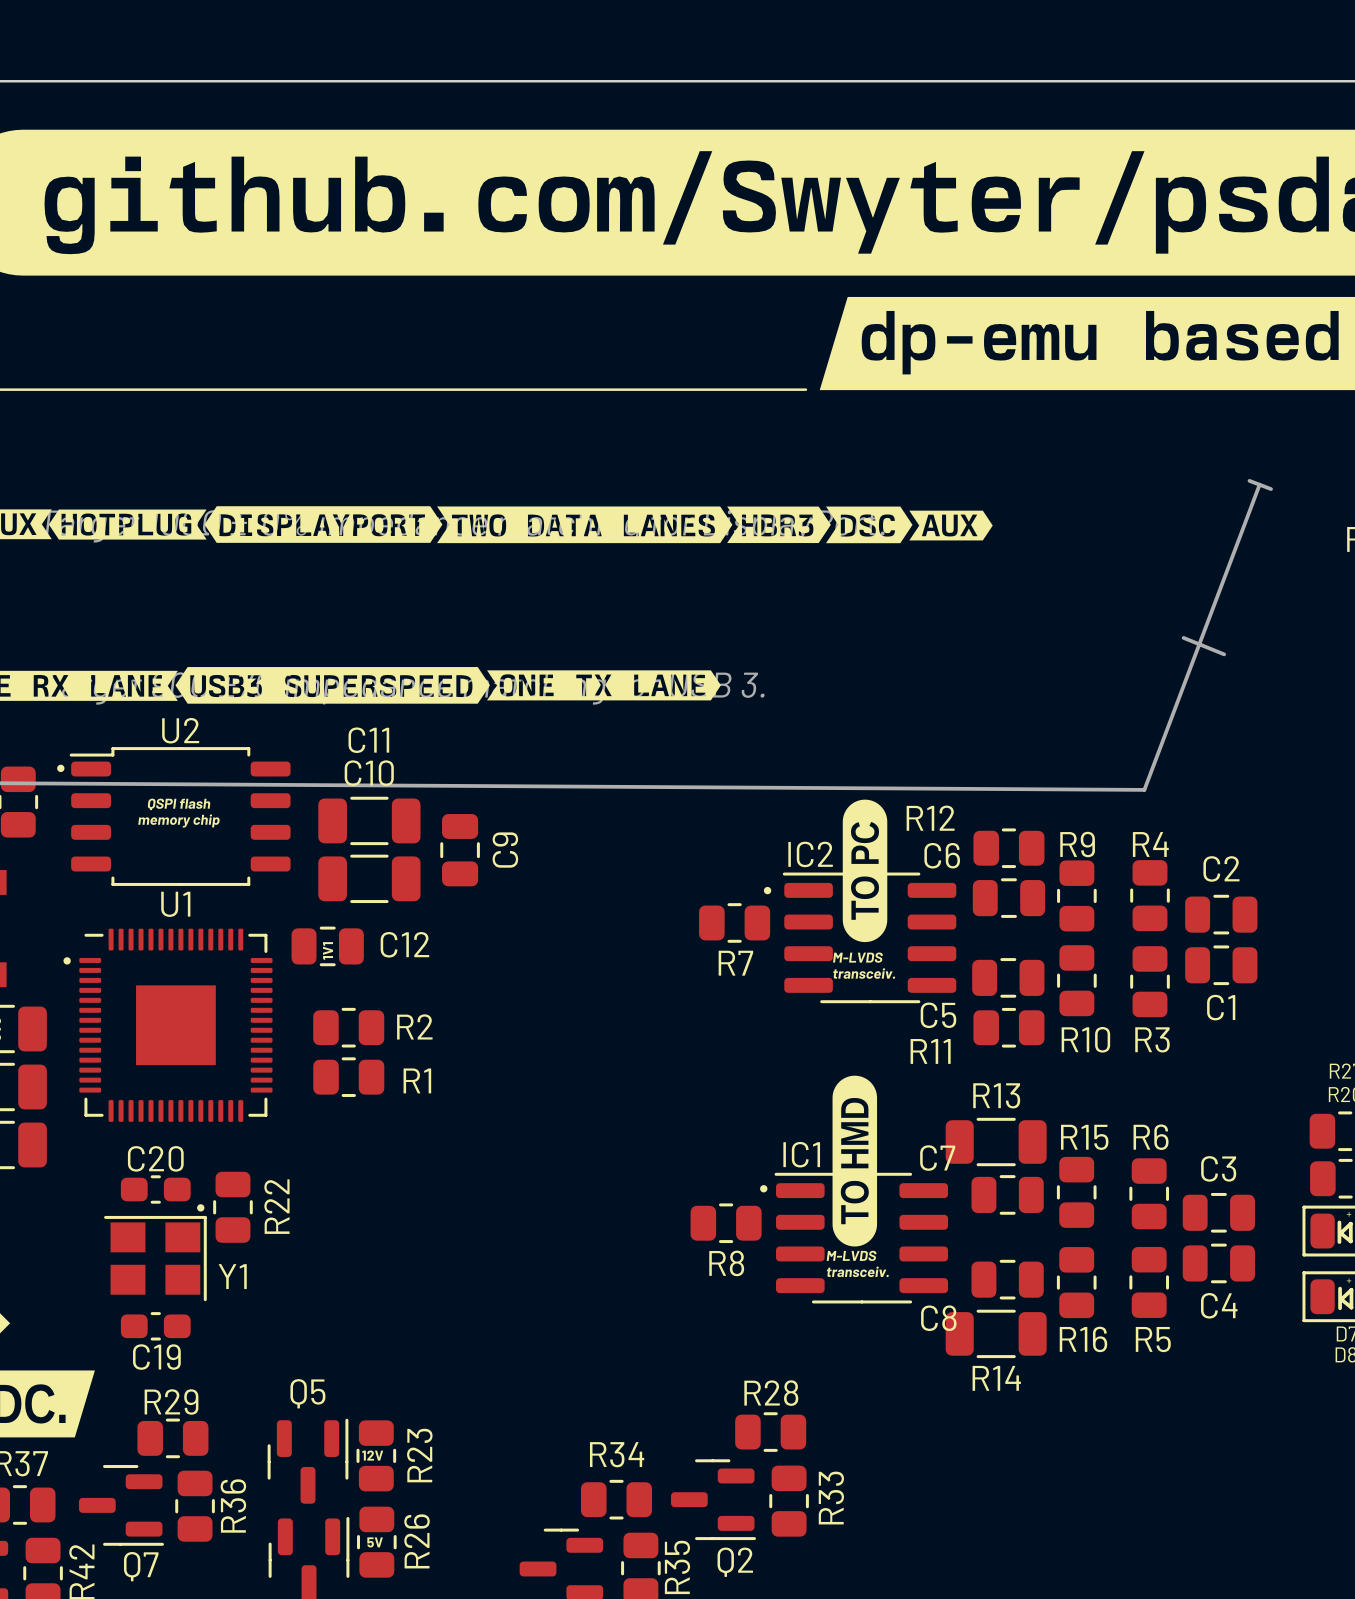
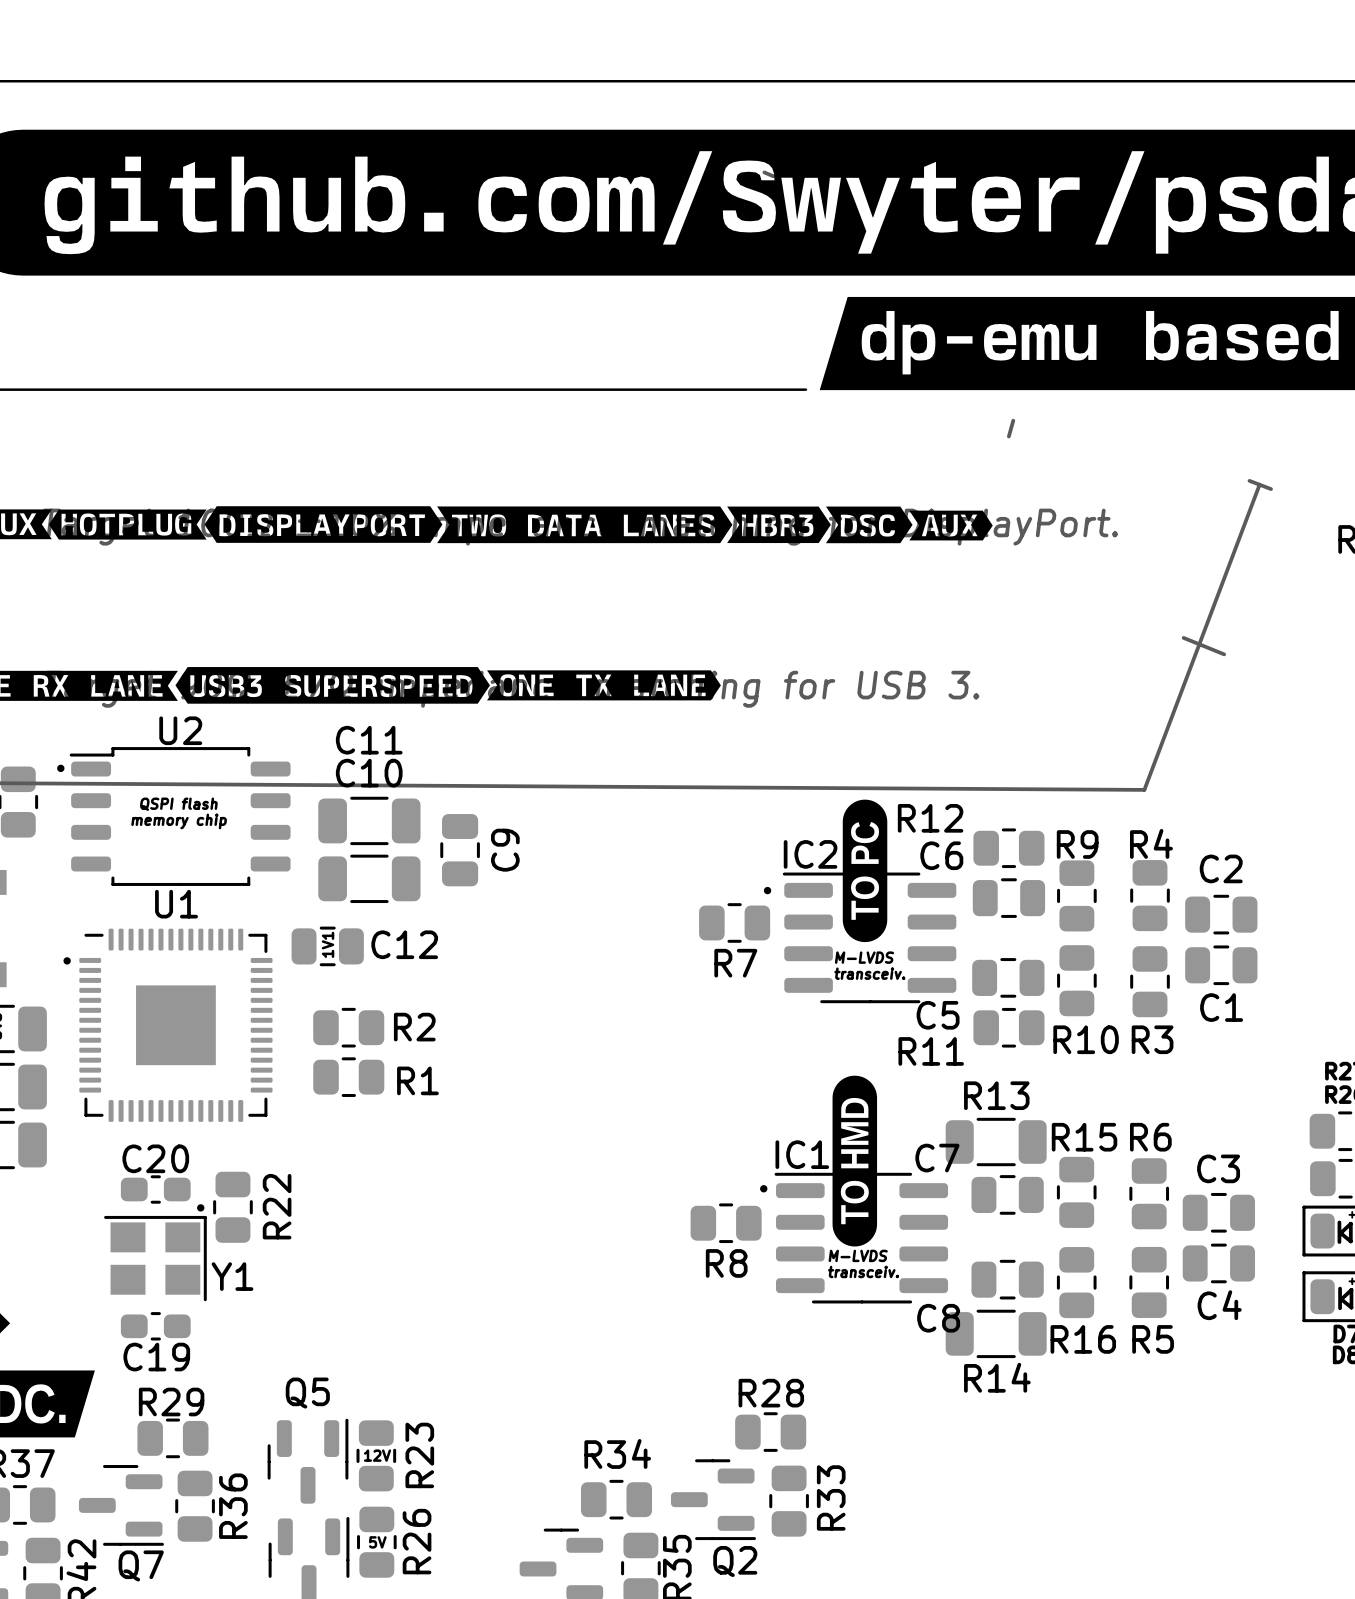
line: none -> (764, 172) (773, 176)
line: none -> (1013, 420) (1008, 436)

